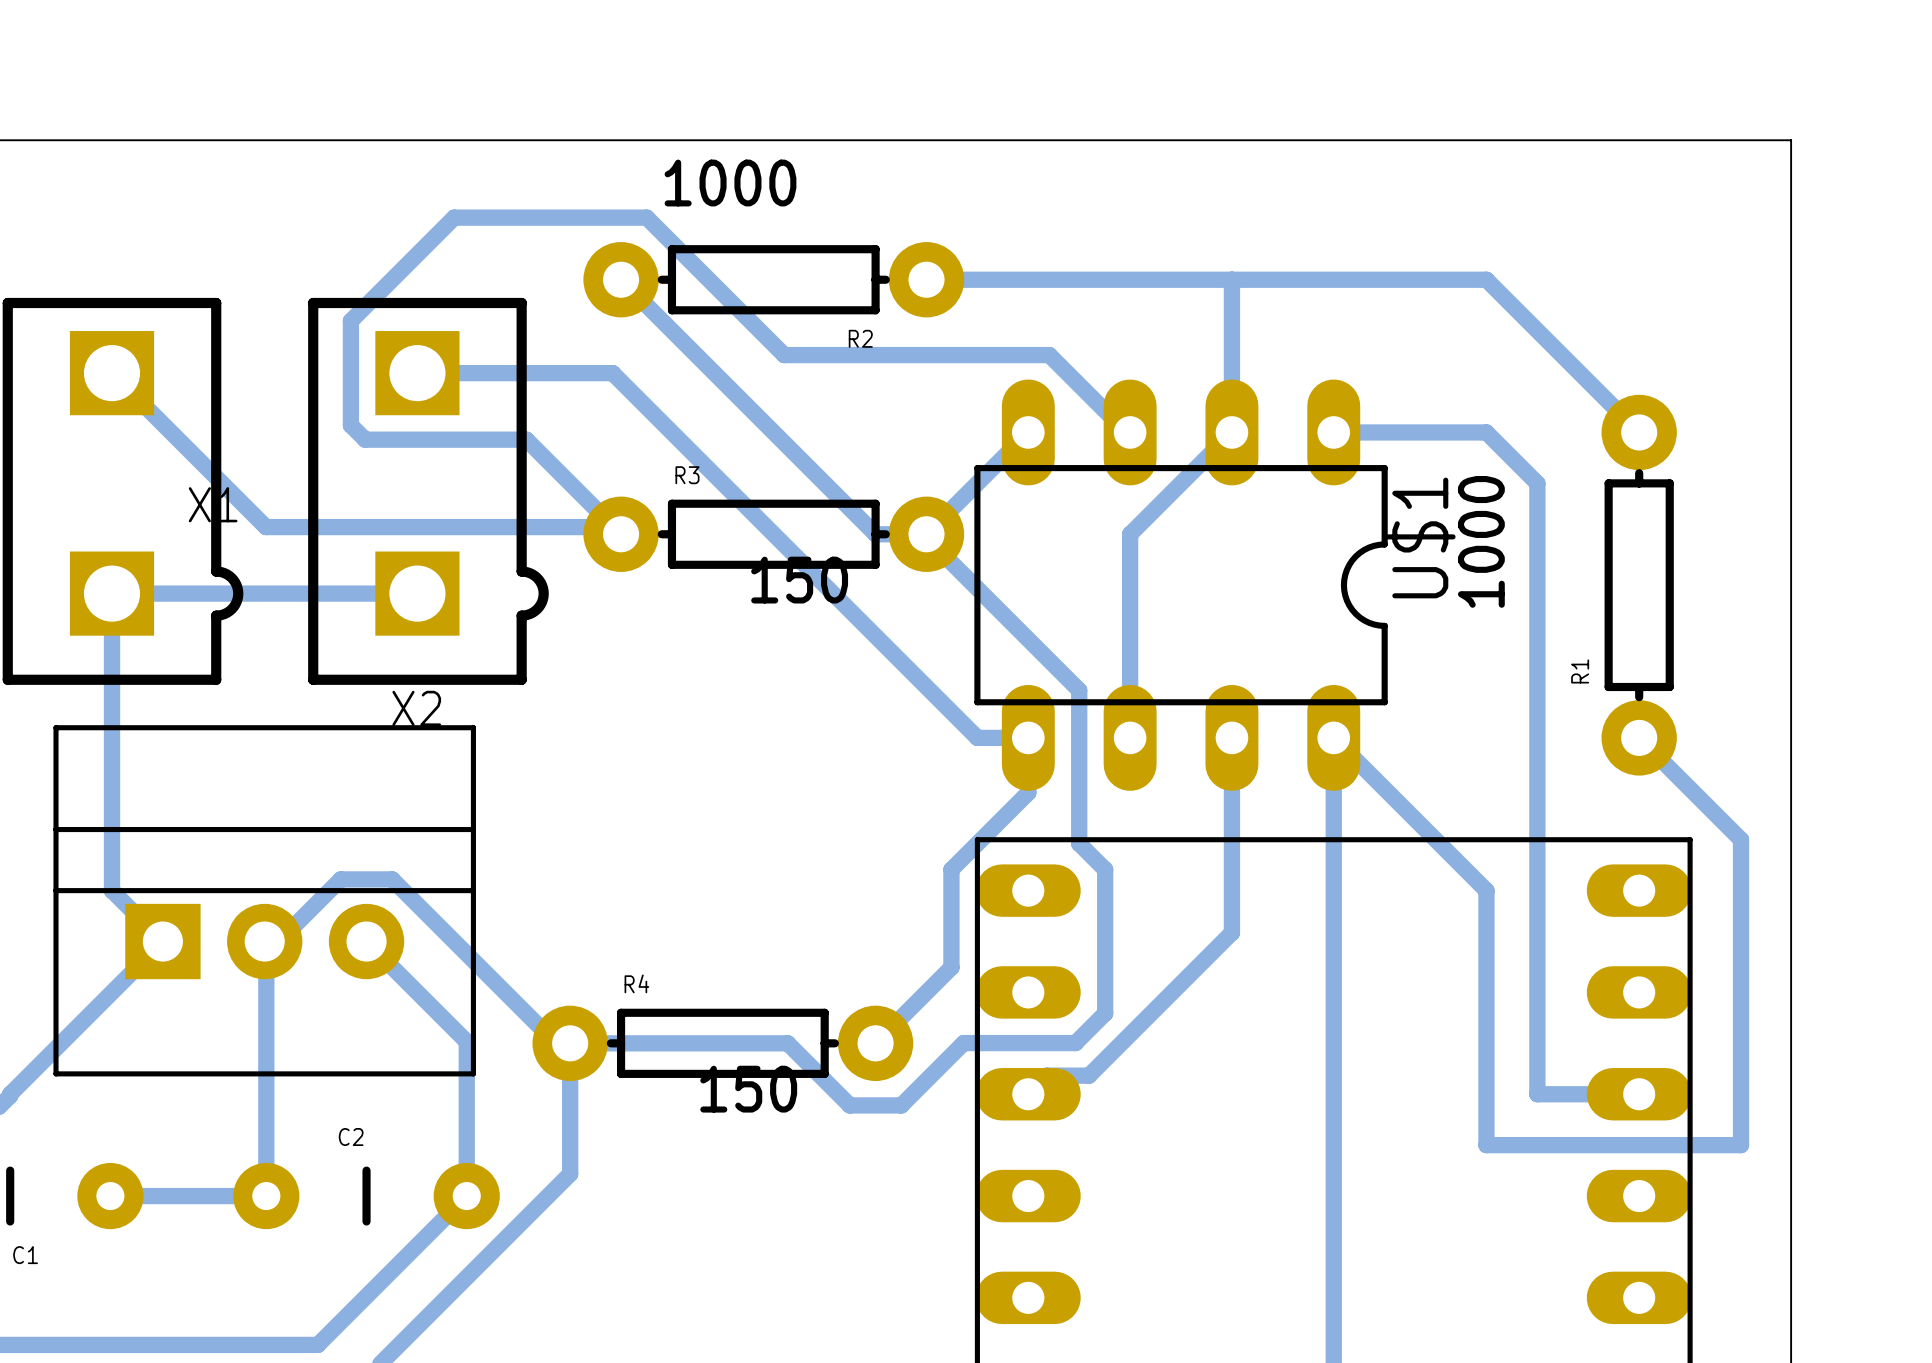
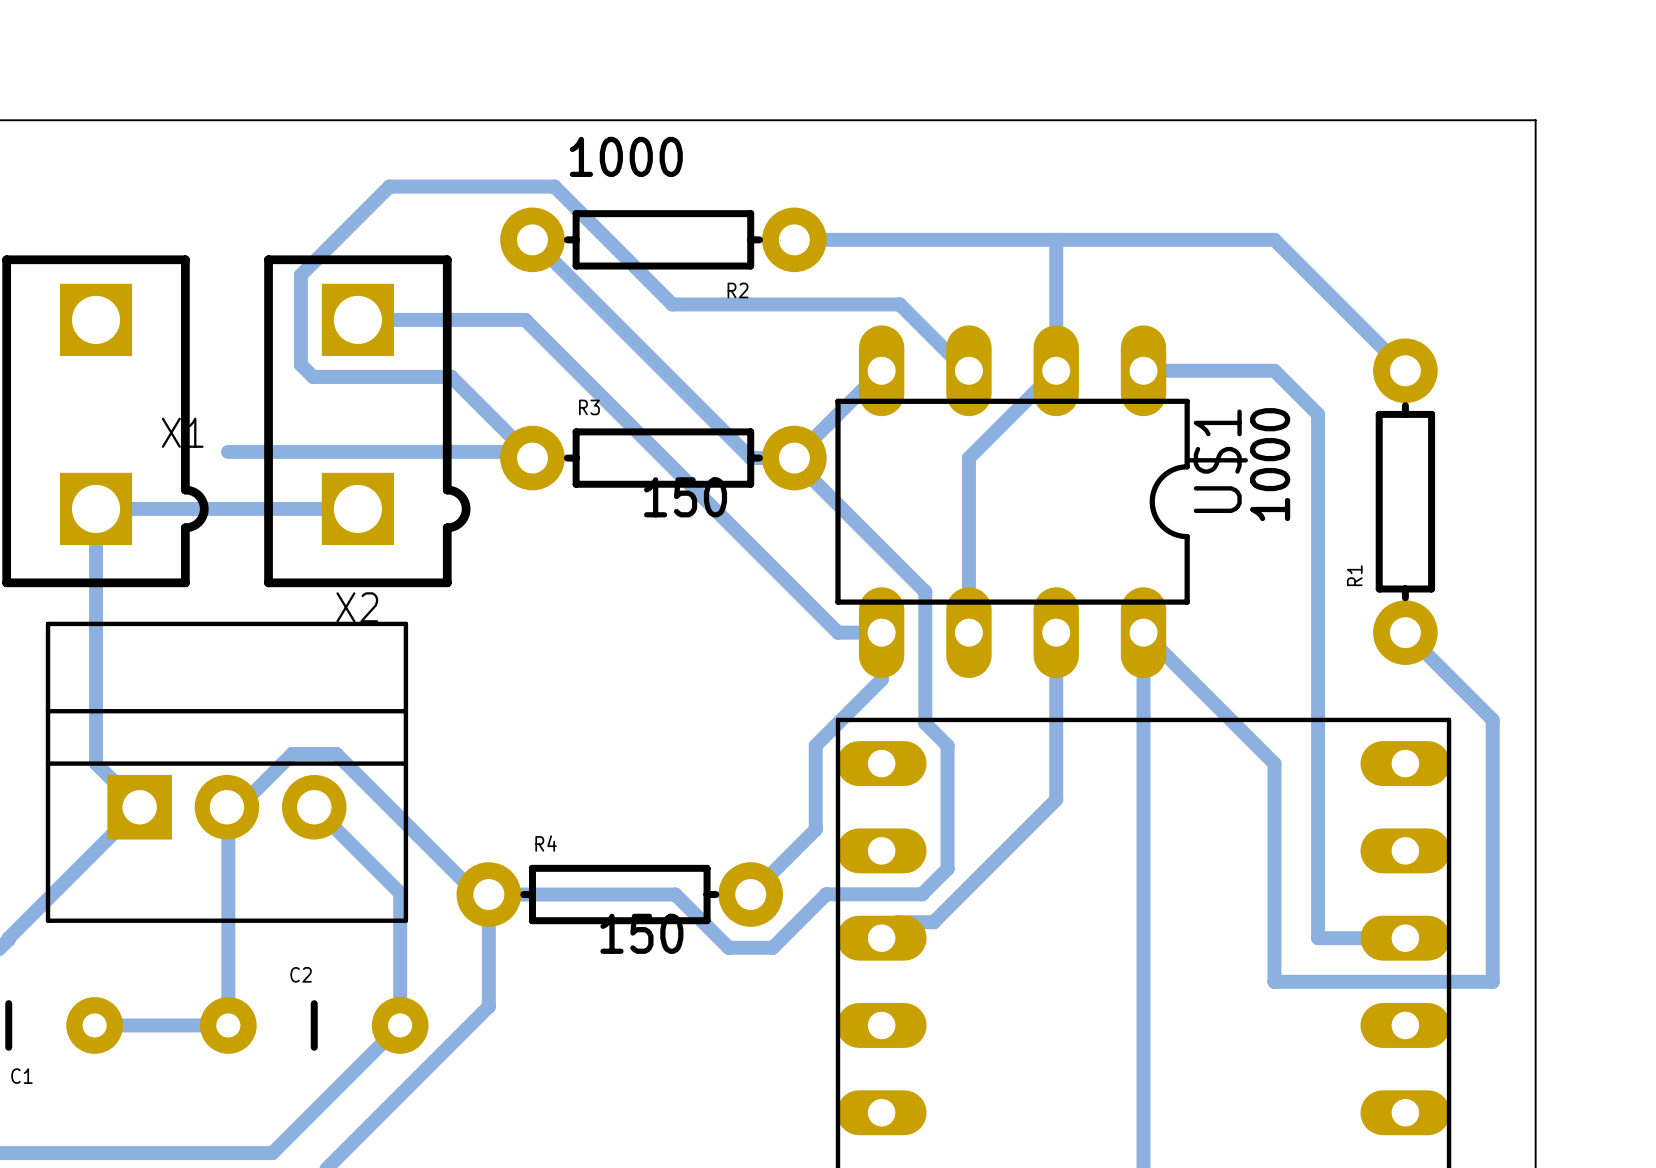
bottom track: (112, 373) (265, 527) -> none

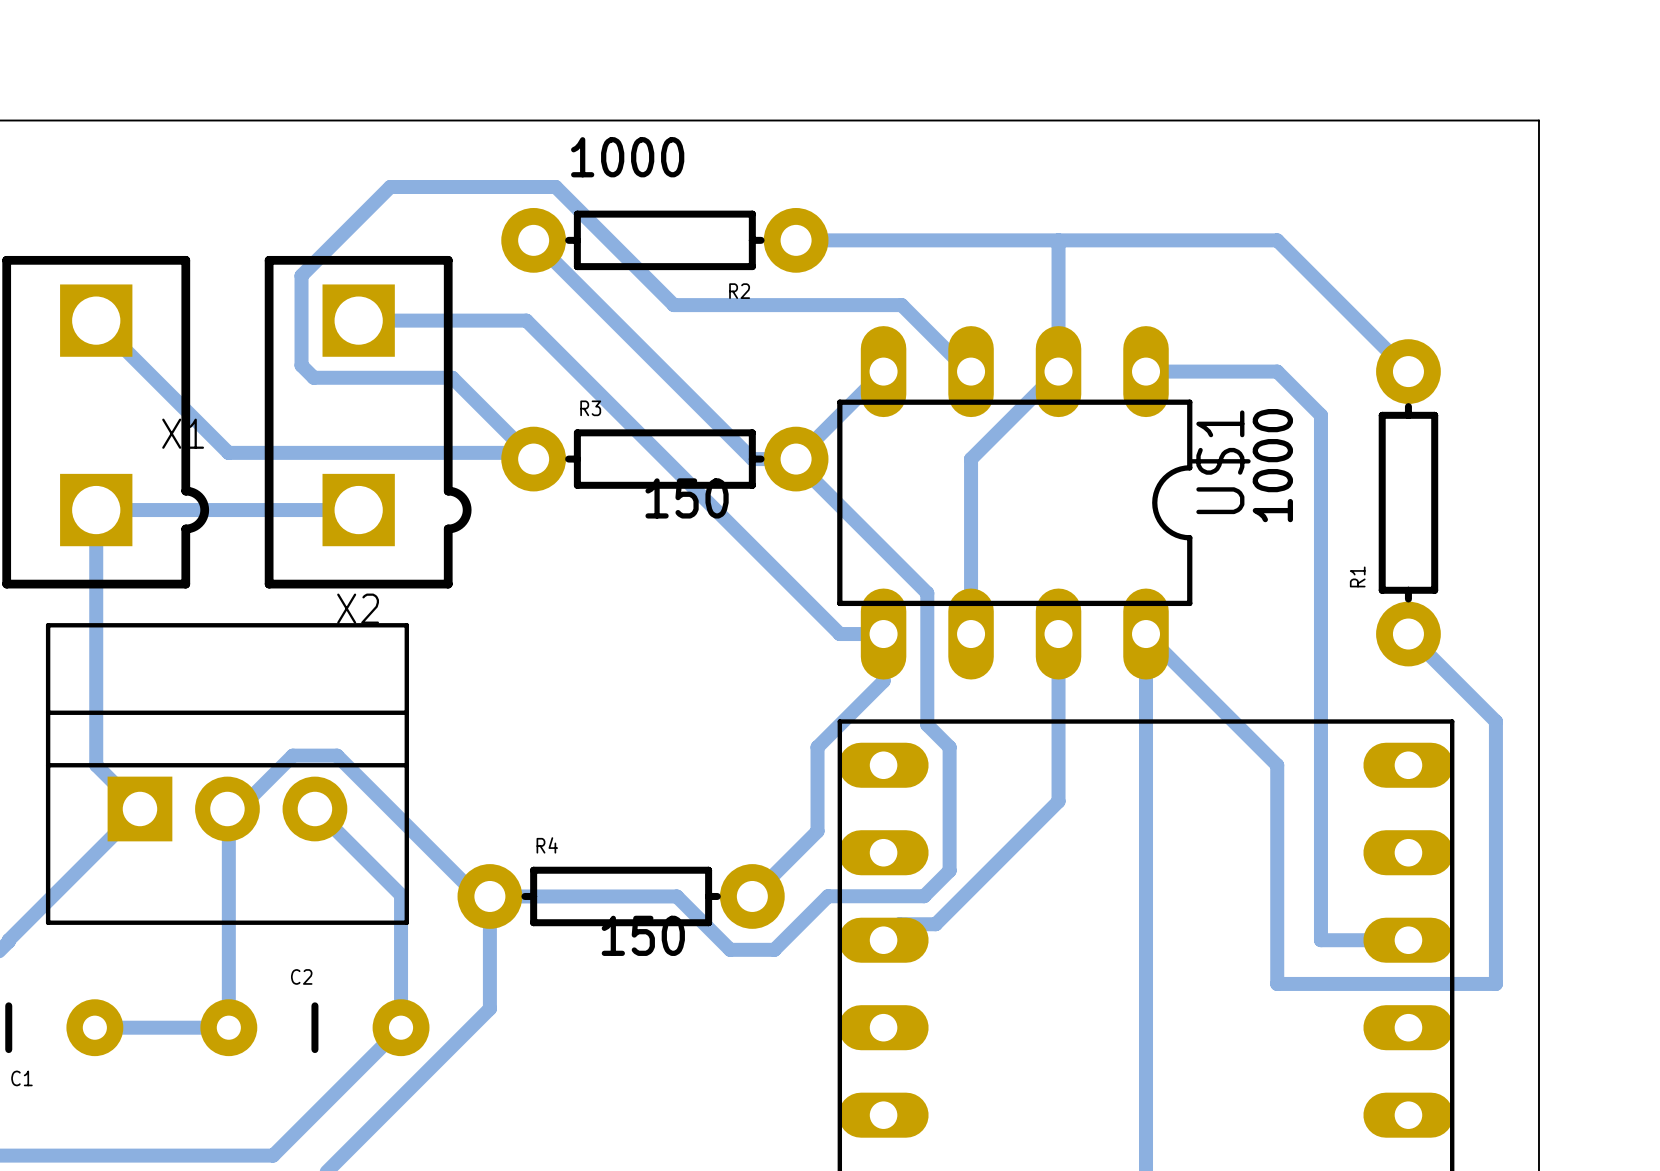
bottom track: none -> (96, 320) (228, 452)

